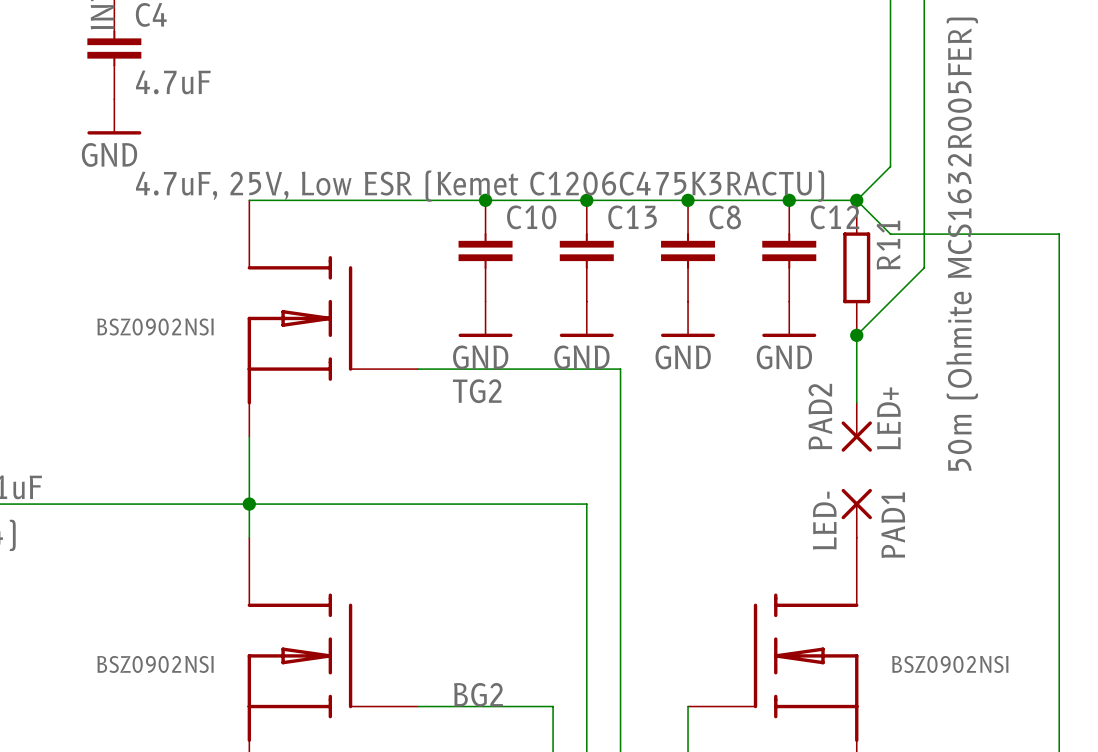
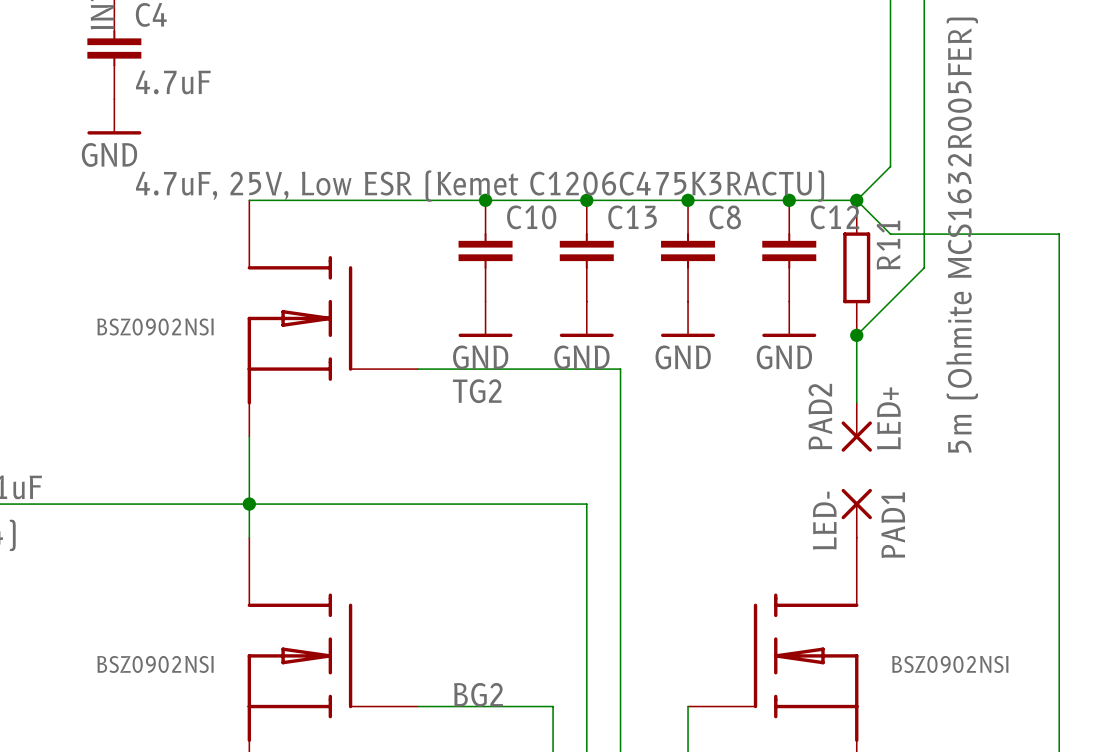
R11 value: 50m (Ohmite MCS1632R005FER) (962, 244) -> 5m (Ohmite MCS1632R005FER) (962, 235)

